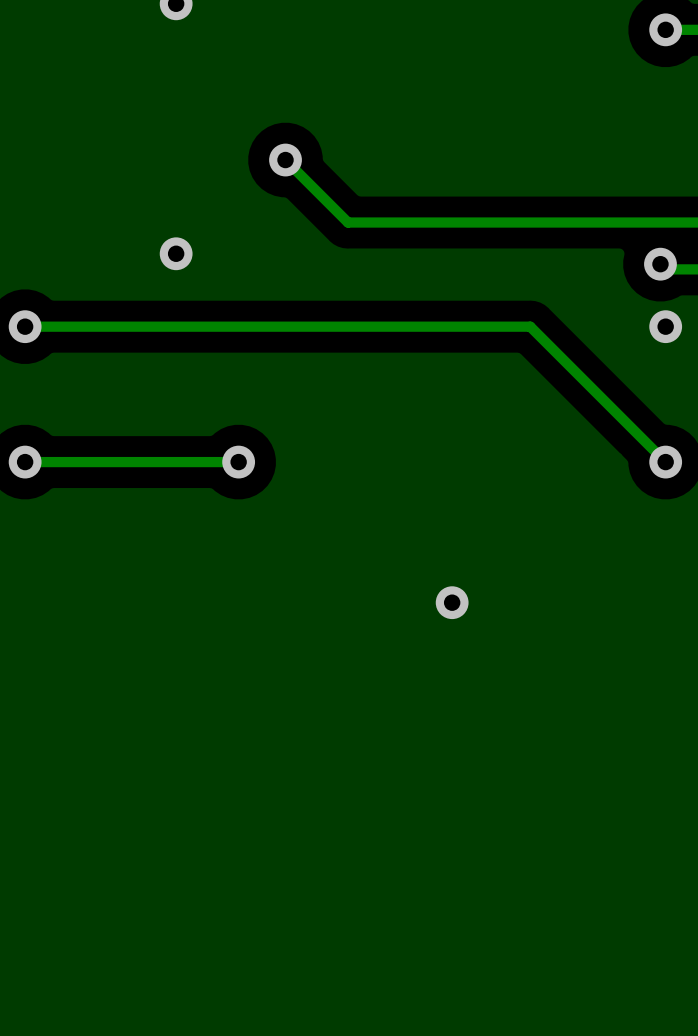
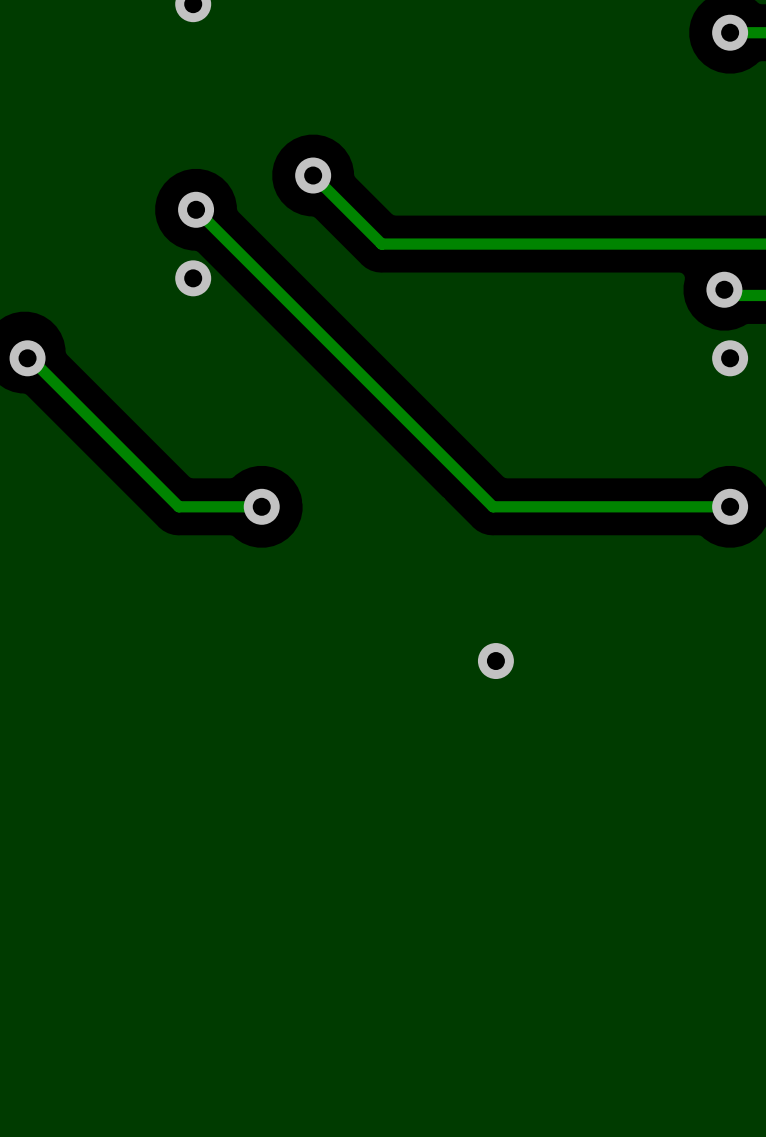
via: none -> (196, 209)
track: (25, 326) (530, 326) (665, 462) -> (196, 209) (493, 506) (730, 506)
via: (25, 462) -> none
track: (163, 462) (25, 462) -> (178, 506) (24, 352)

